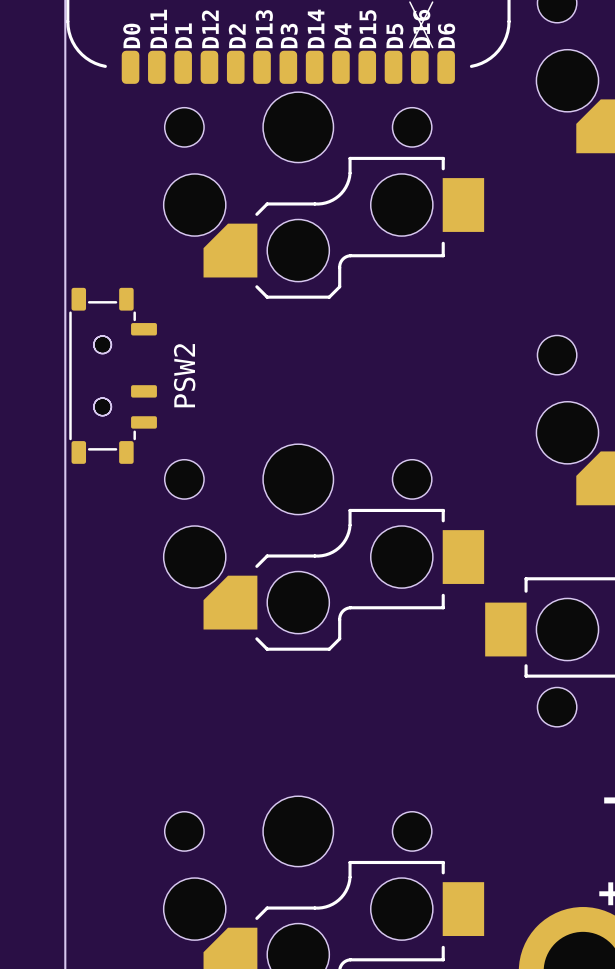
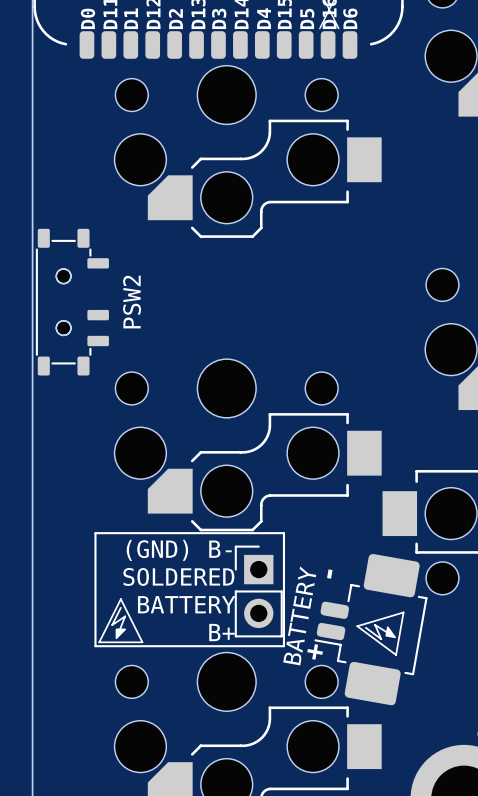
line: none -> (283, 533) (95, 533) (95, 646) (283, 646) (283, 533)
text: none -> (GND) B- (179, 550)
text: none -> - (329, 574)
text: none -> SOLDERED (178, 576)
part: none -> (258, 591)
drawing: none -> [98, 598, 144, 644]
text: none -> BATTERY (186, 604)
drawing: none -> [356, 611, 405, 656]
text: none -> BATTERY (299, 615)
part: none -> (370, 629)
text: none -> B+ (222, 632)
text: none -> + (315, 651)

